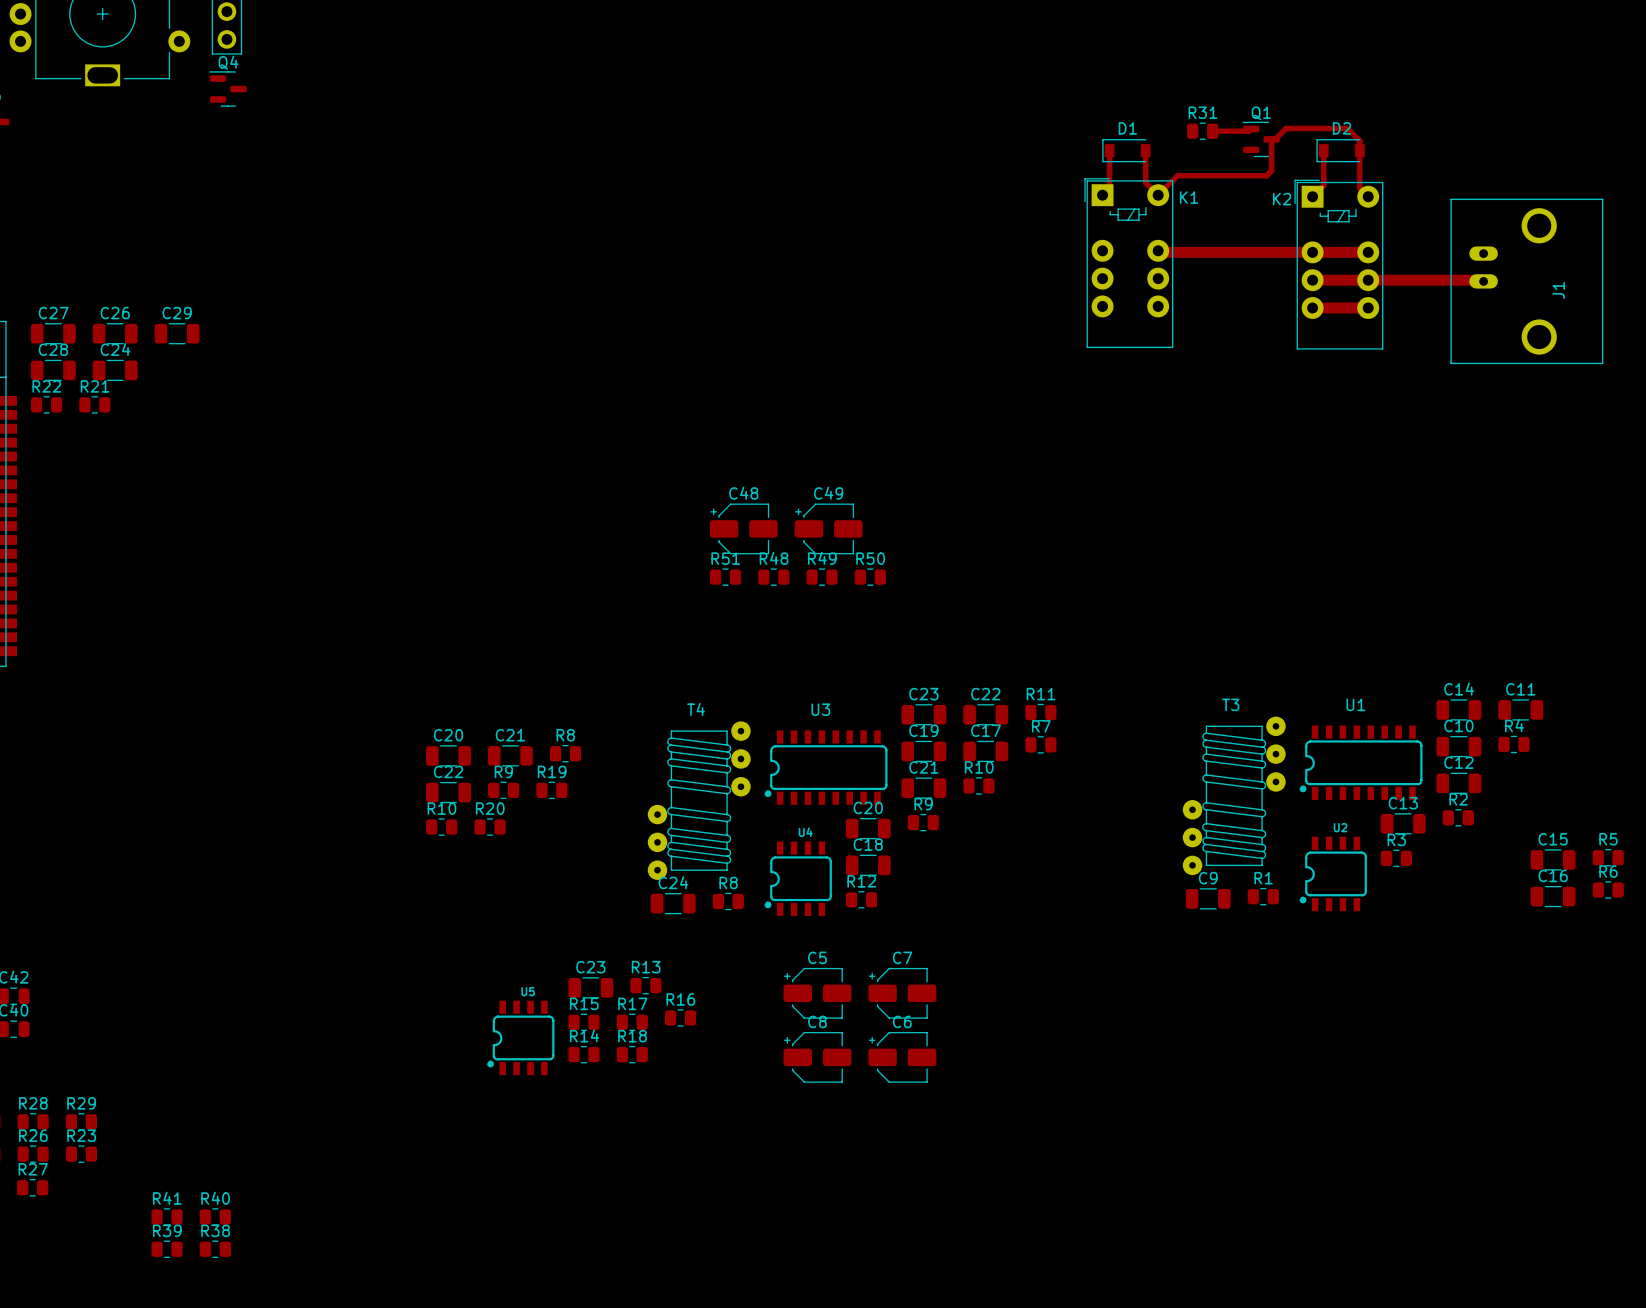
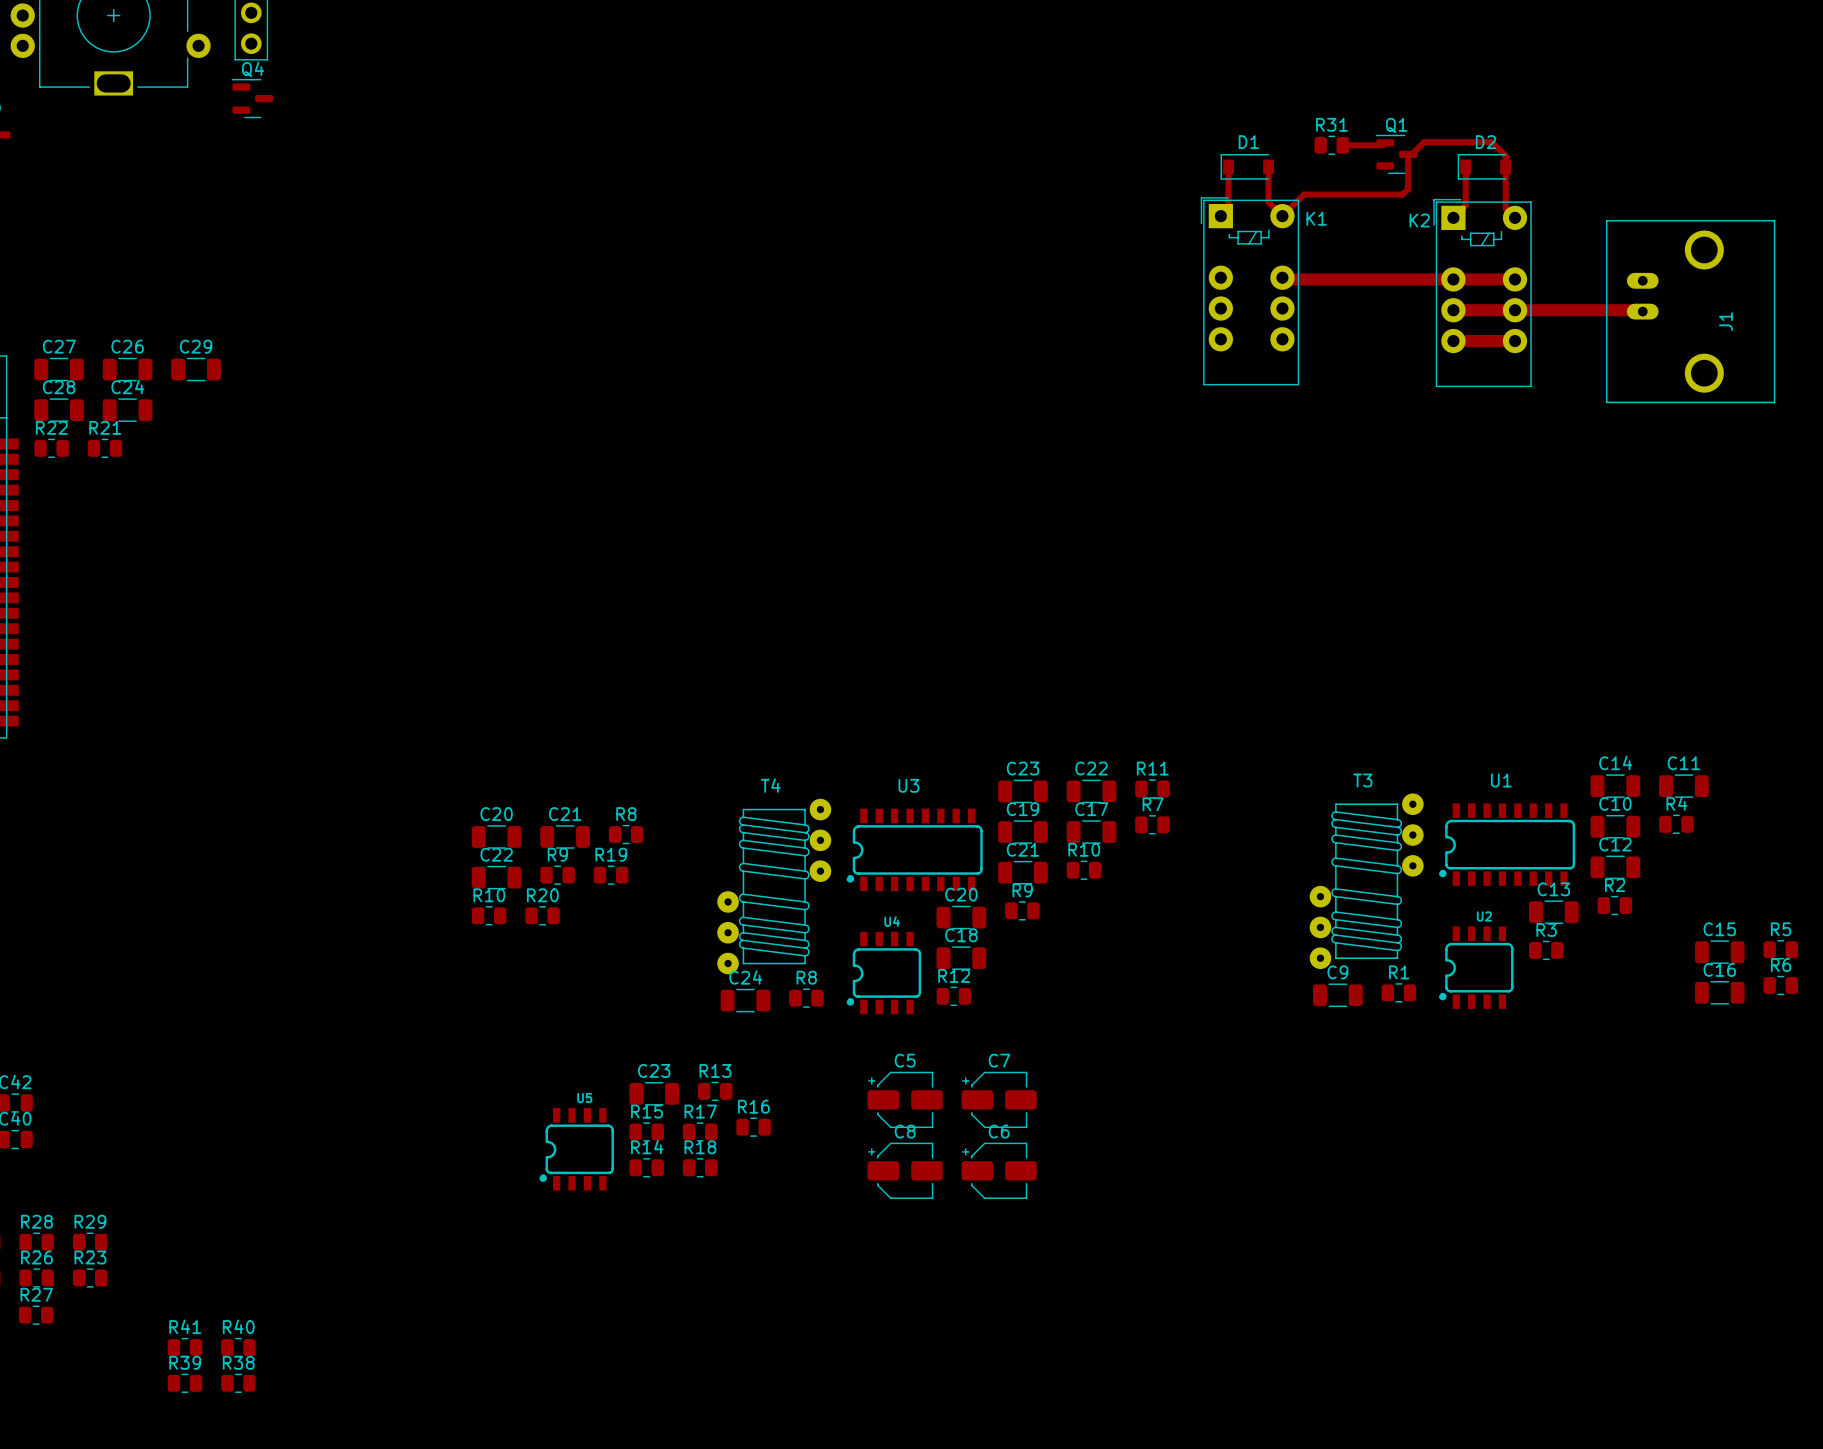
C48: (743, 528) -> none
C49: (828, 528) -> none
R51: (725, 577) -> none
R48: (773, 577) -> none
R49: (822, 577) -> none
R50: (870, 577) -> none

